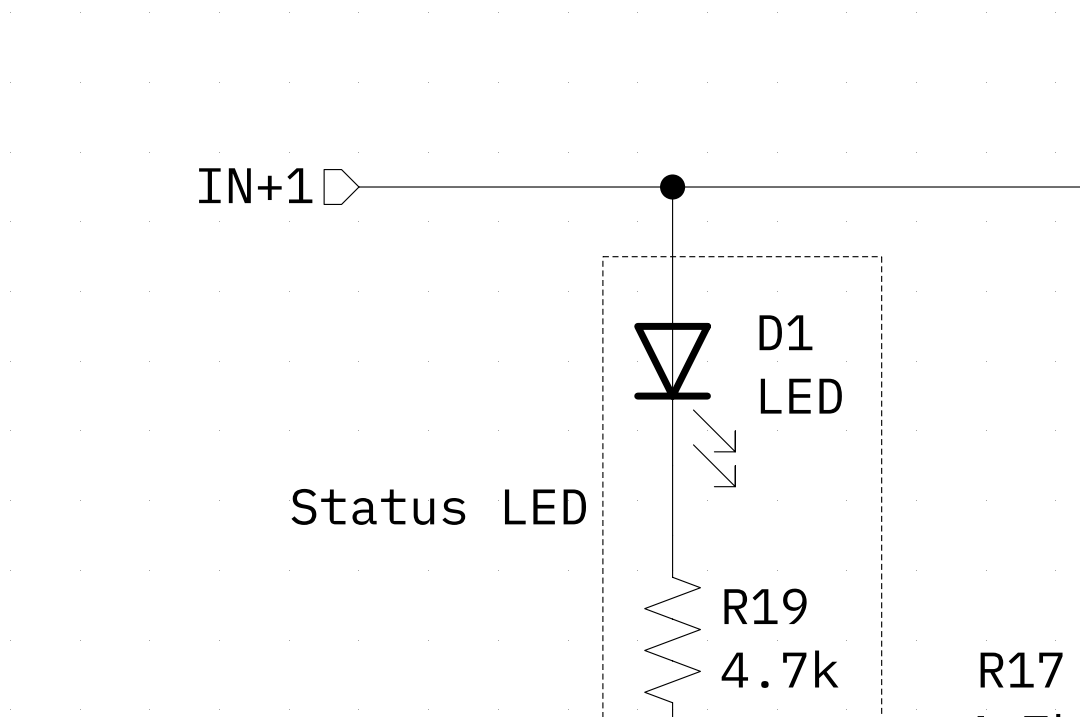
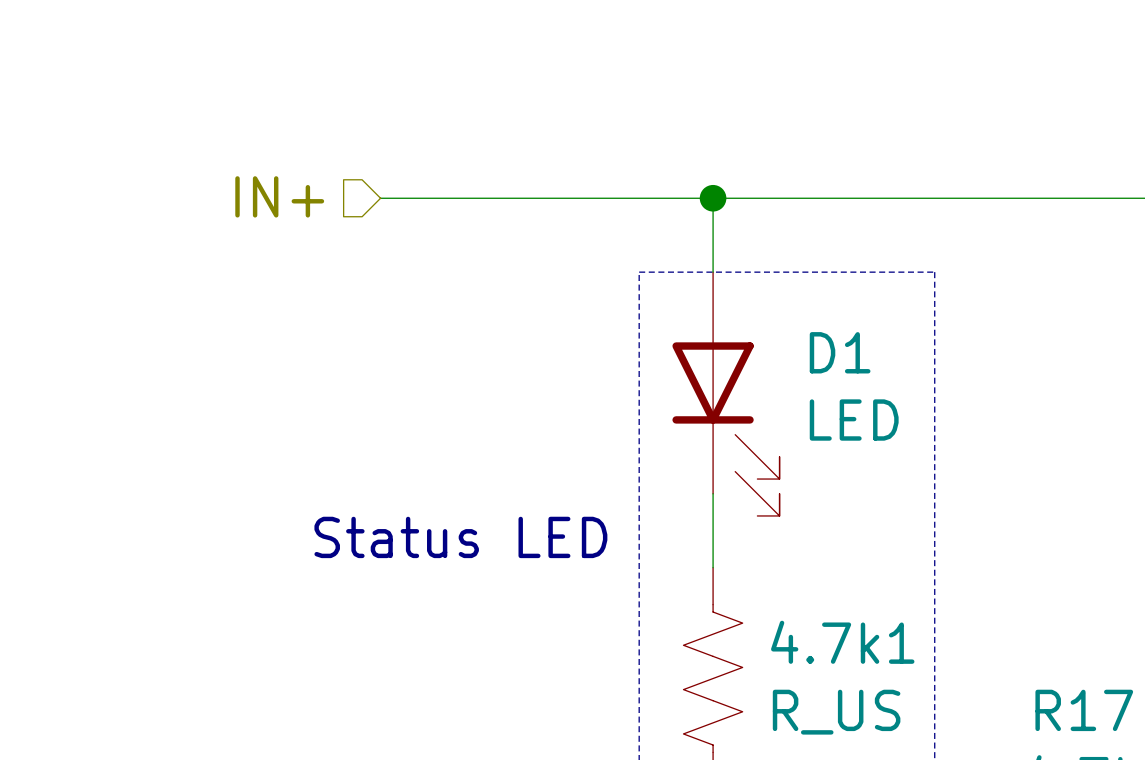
hierarchical label: IN+1 (255, 185) -> IN+ (279, 196)
R19 name: R19 (765, 606) -> 4.7k1 (842, 642)
R19 value: 4.7k (780, 669) -> R_US (836, 712)

